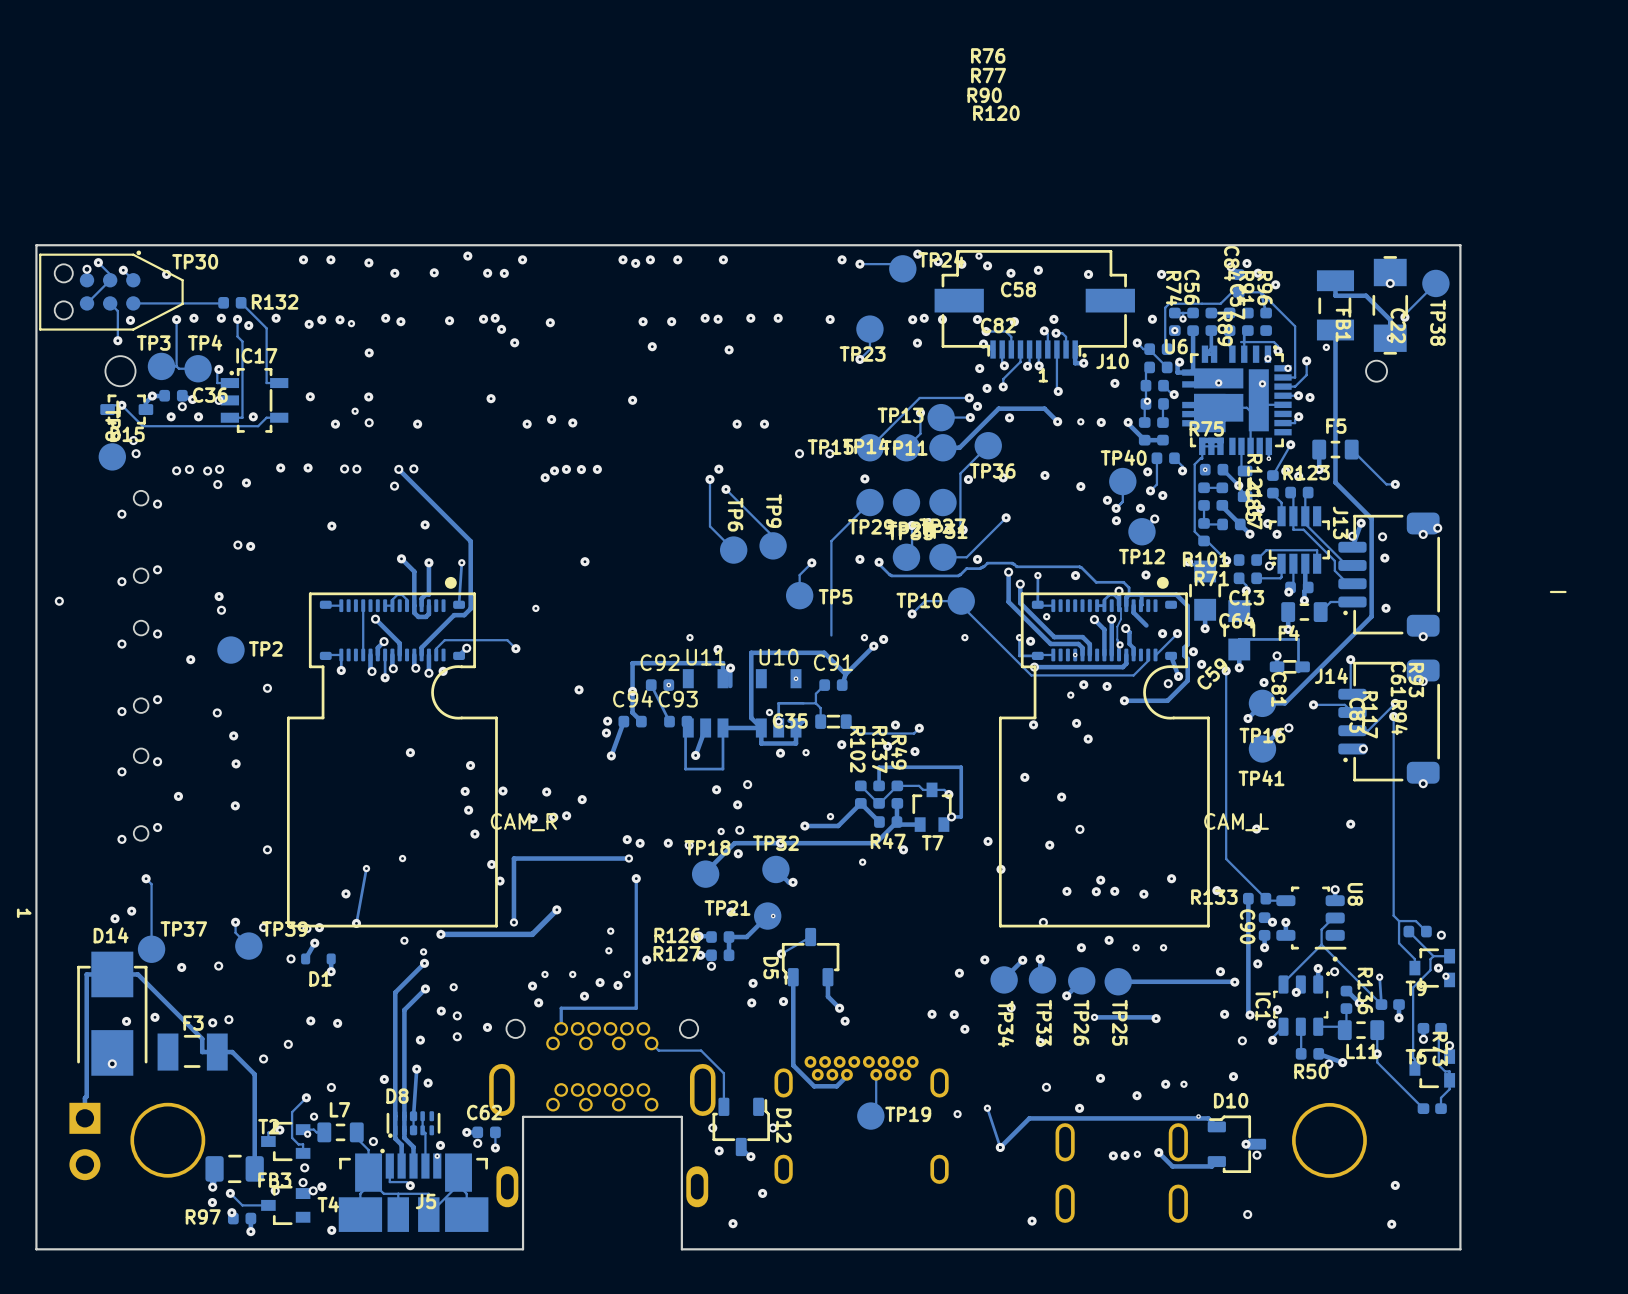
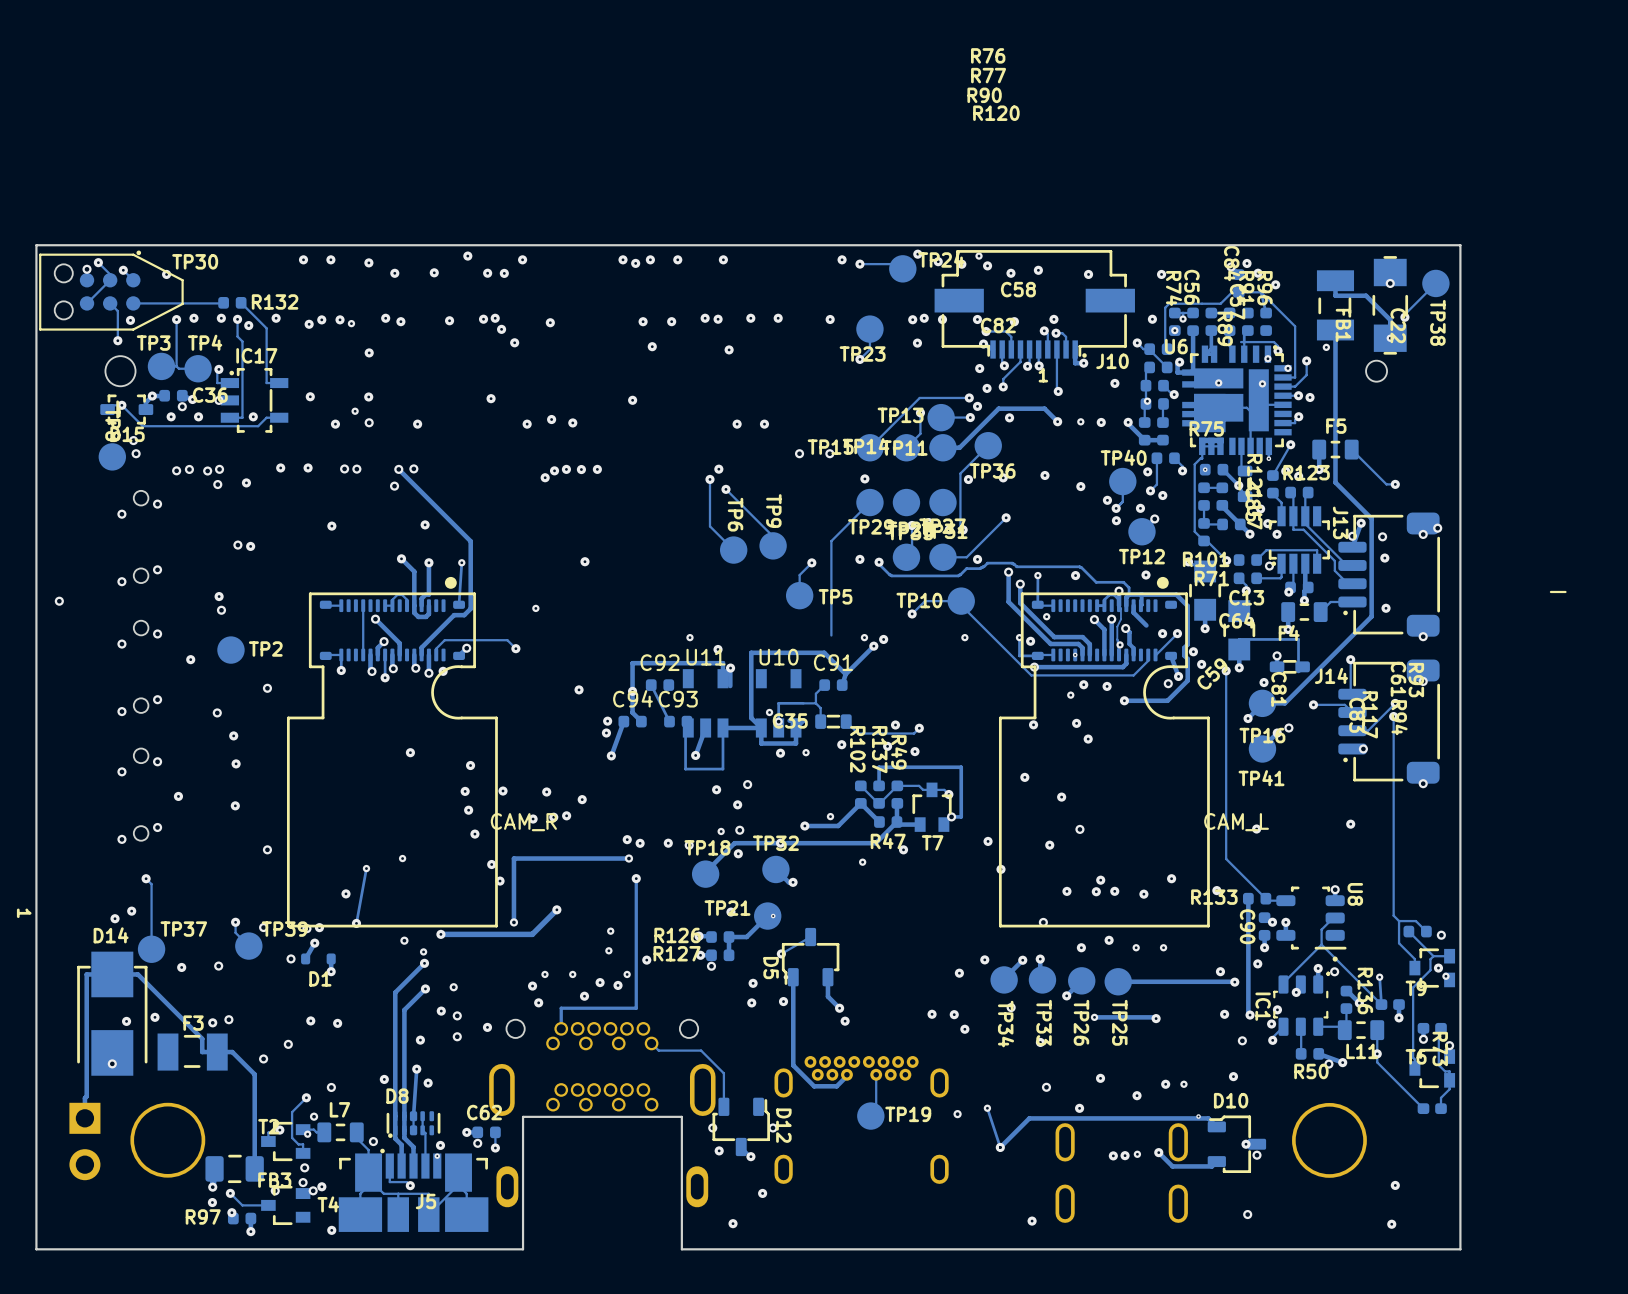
via: (796, 678) -> none
via: (668, 685) -> none

